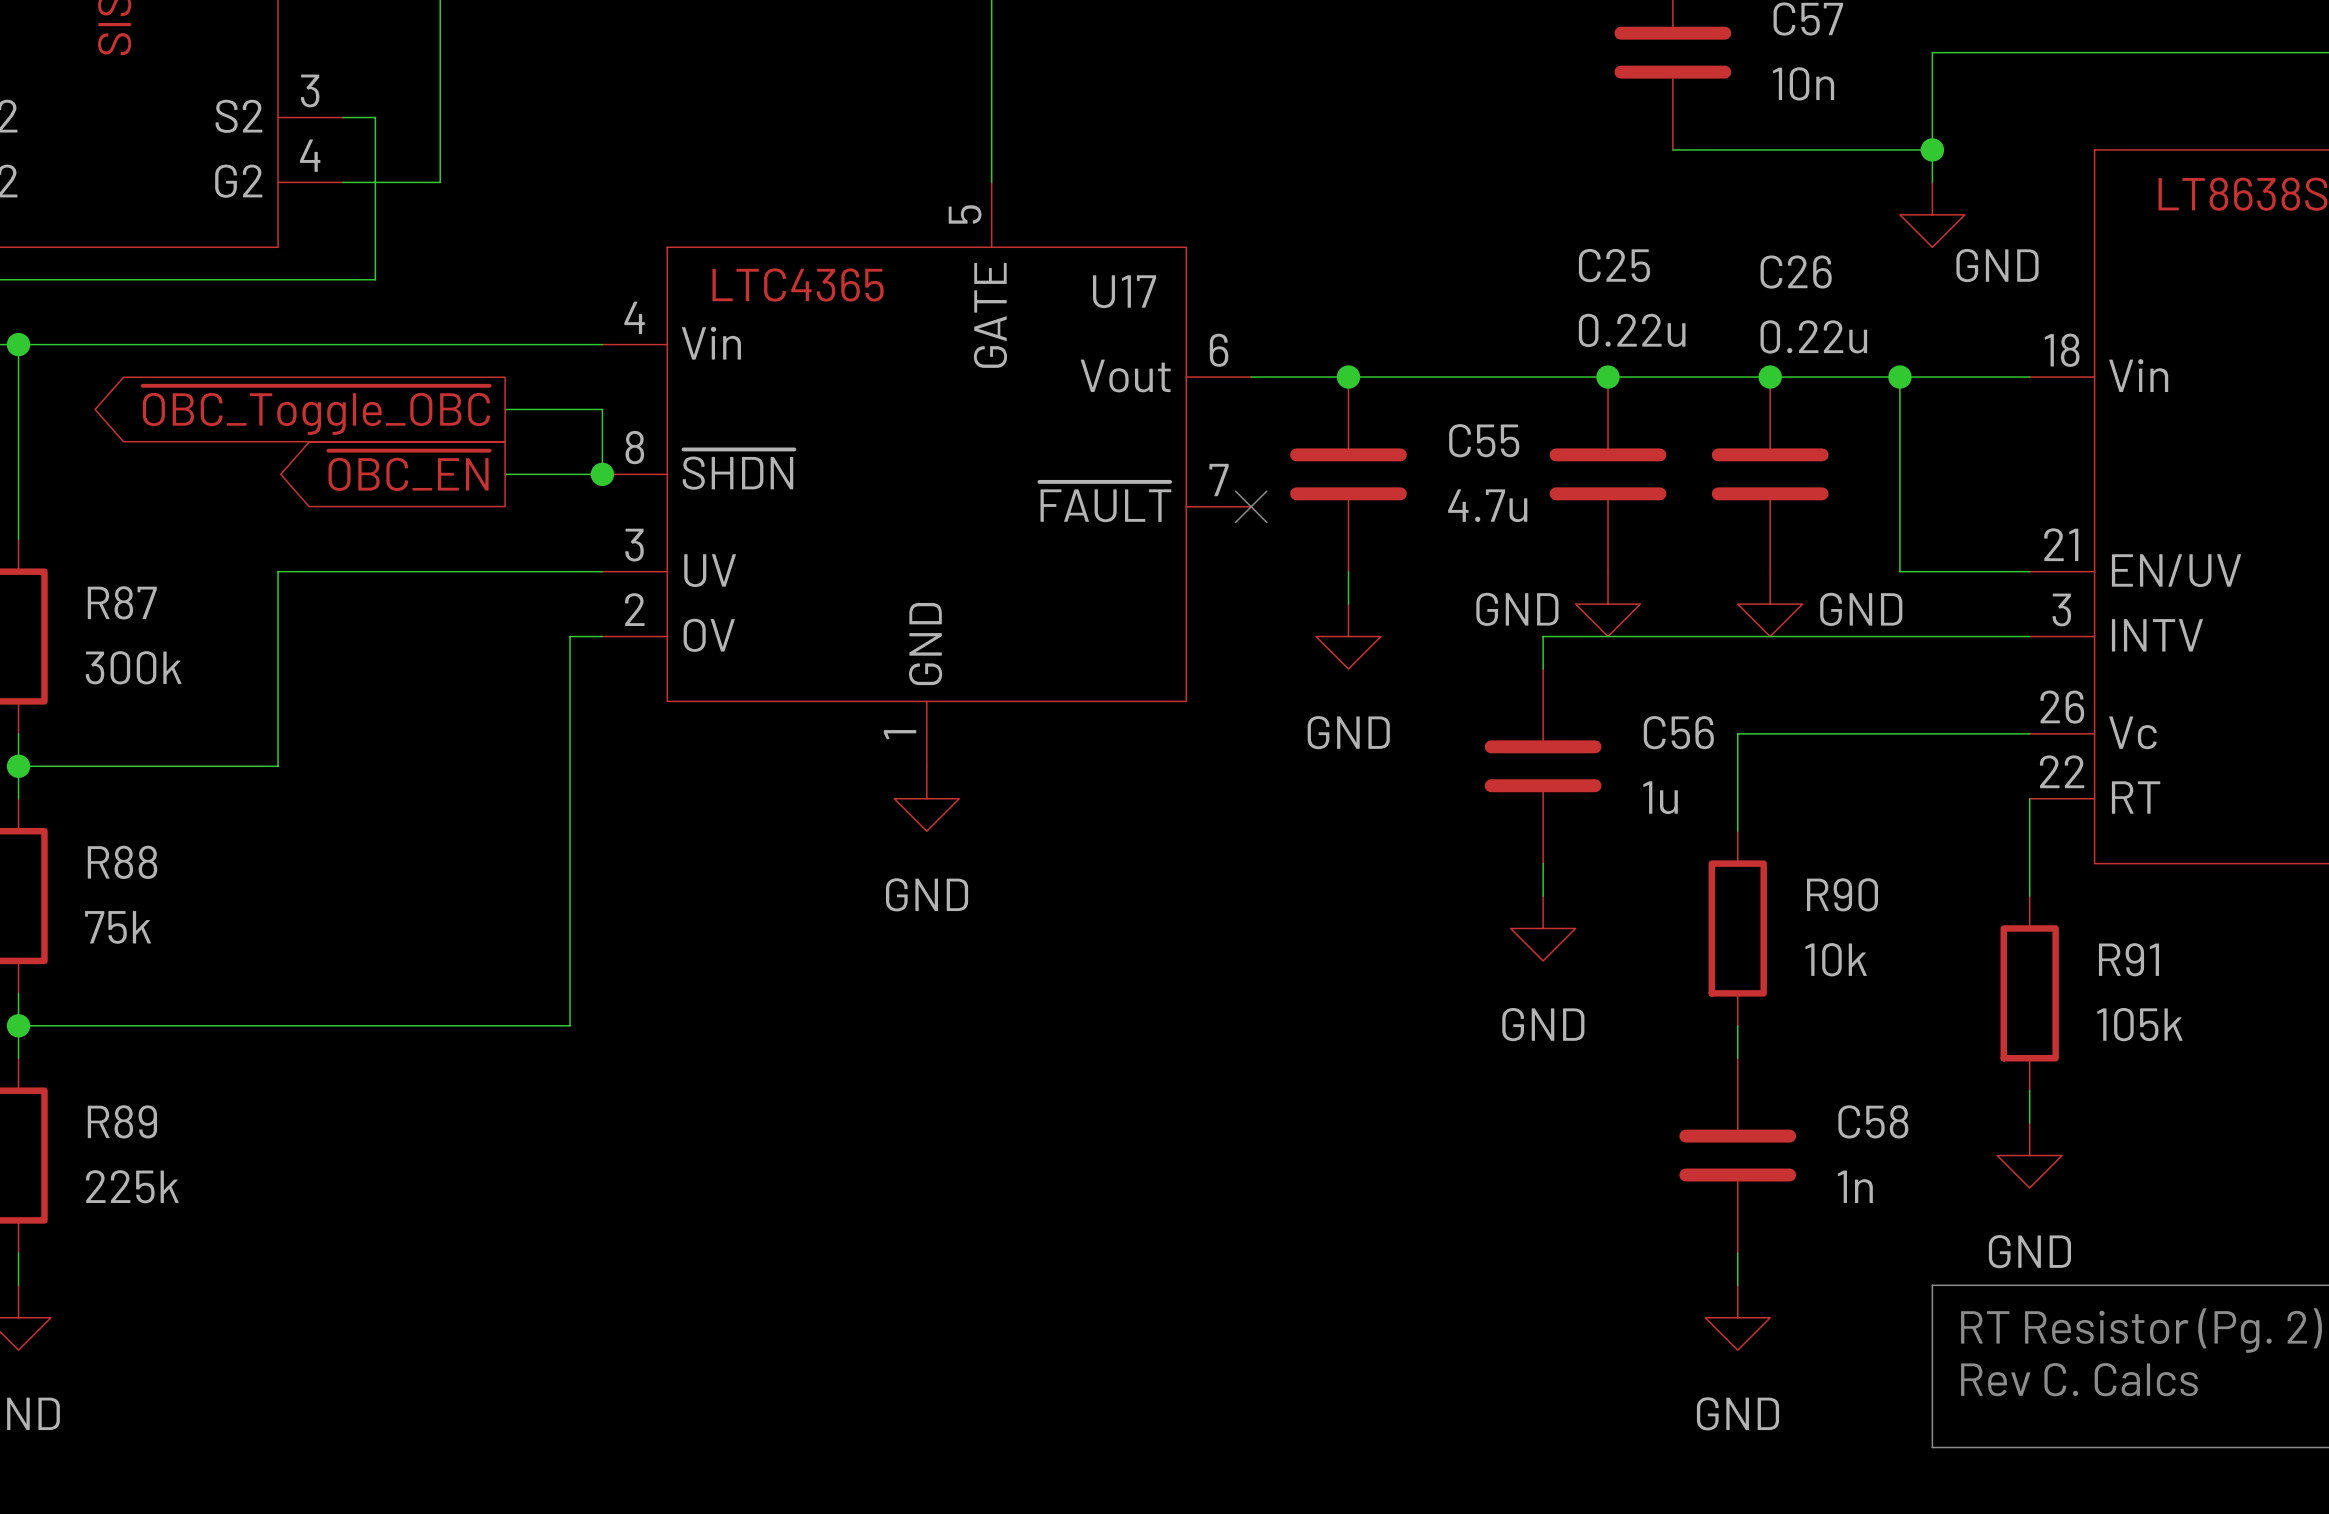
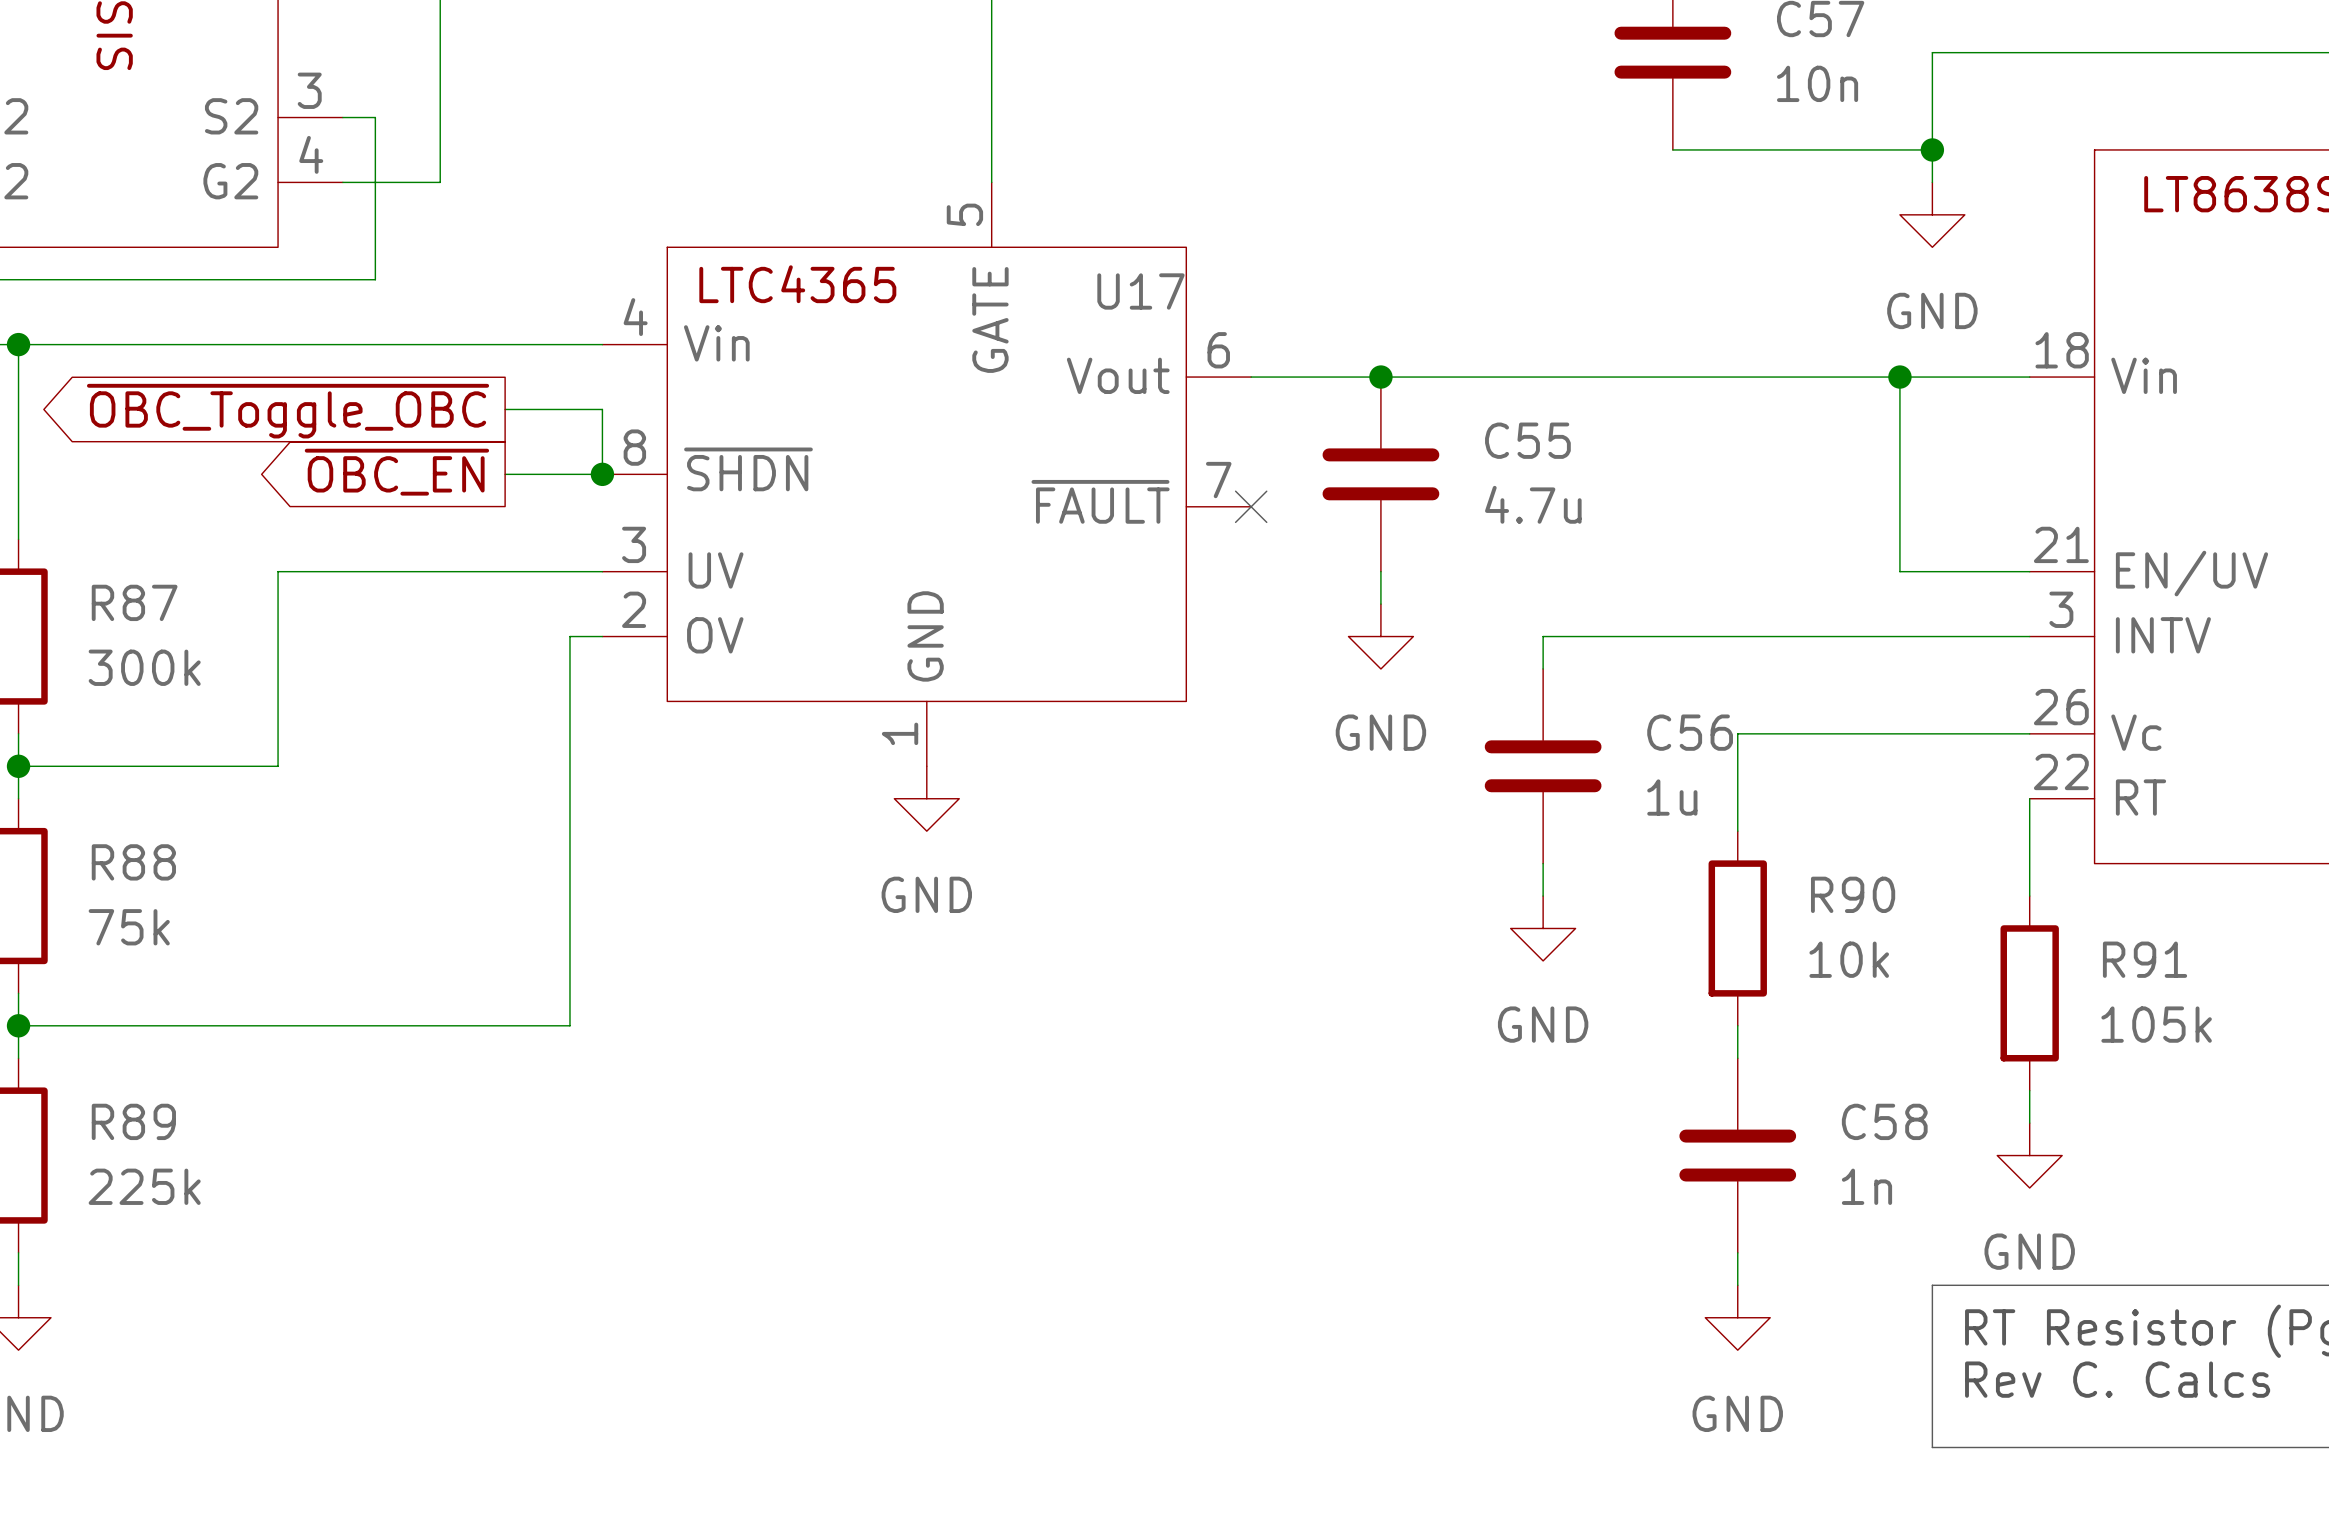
power symbol text position: GND (1997, 265) -> GND (1932, 310)
junction position: (1348, 377) -> (1380, 377)
junction: (1608, 377) -> none
junction: (1770, 377) -> none
C55 position: (1348, 474) -> (1380, 474)
C25: 0.22u (1608, 474) -> none
C26: 0.22u (1770, 474) -> none
wire: (1348, 571) (1348, 604) -> (1380, 571) (1380, 604)
power symbol: GND (1608, 604) -> none
power symbol: GND (1770, 604) -> none
power symbol position: GND (1348, 636) -> GND (1380, 636)

